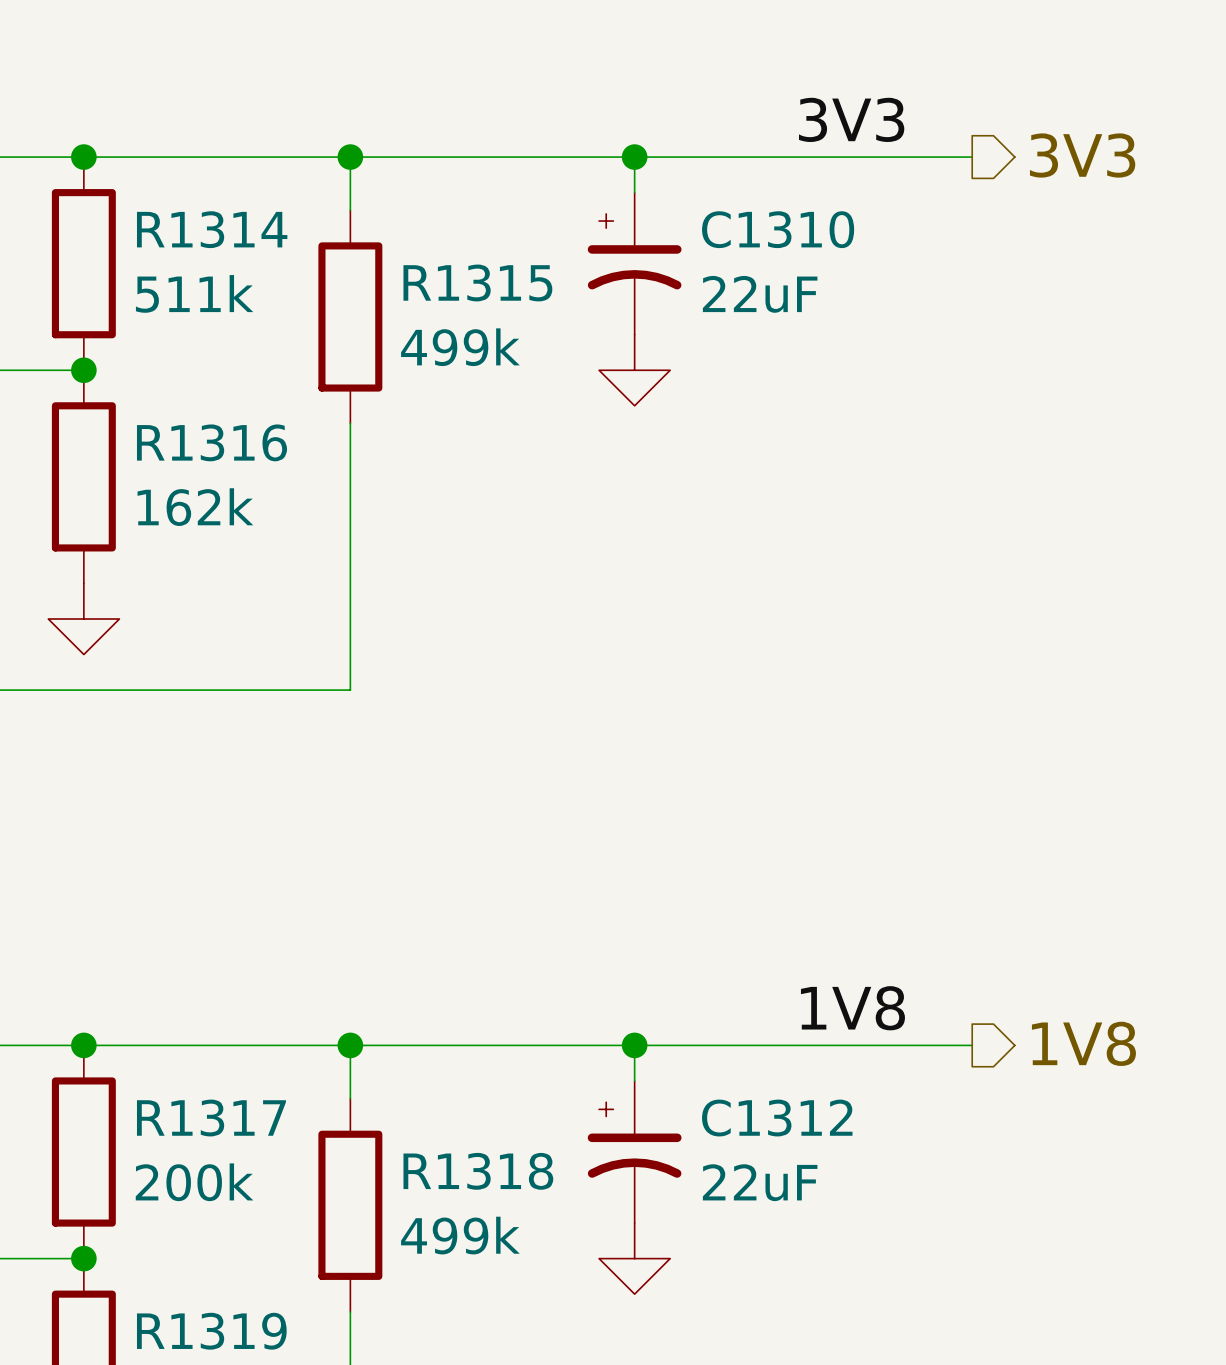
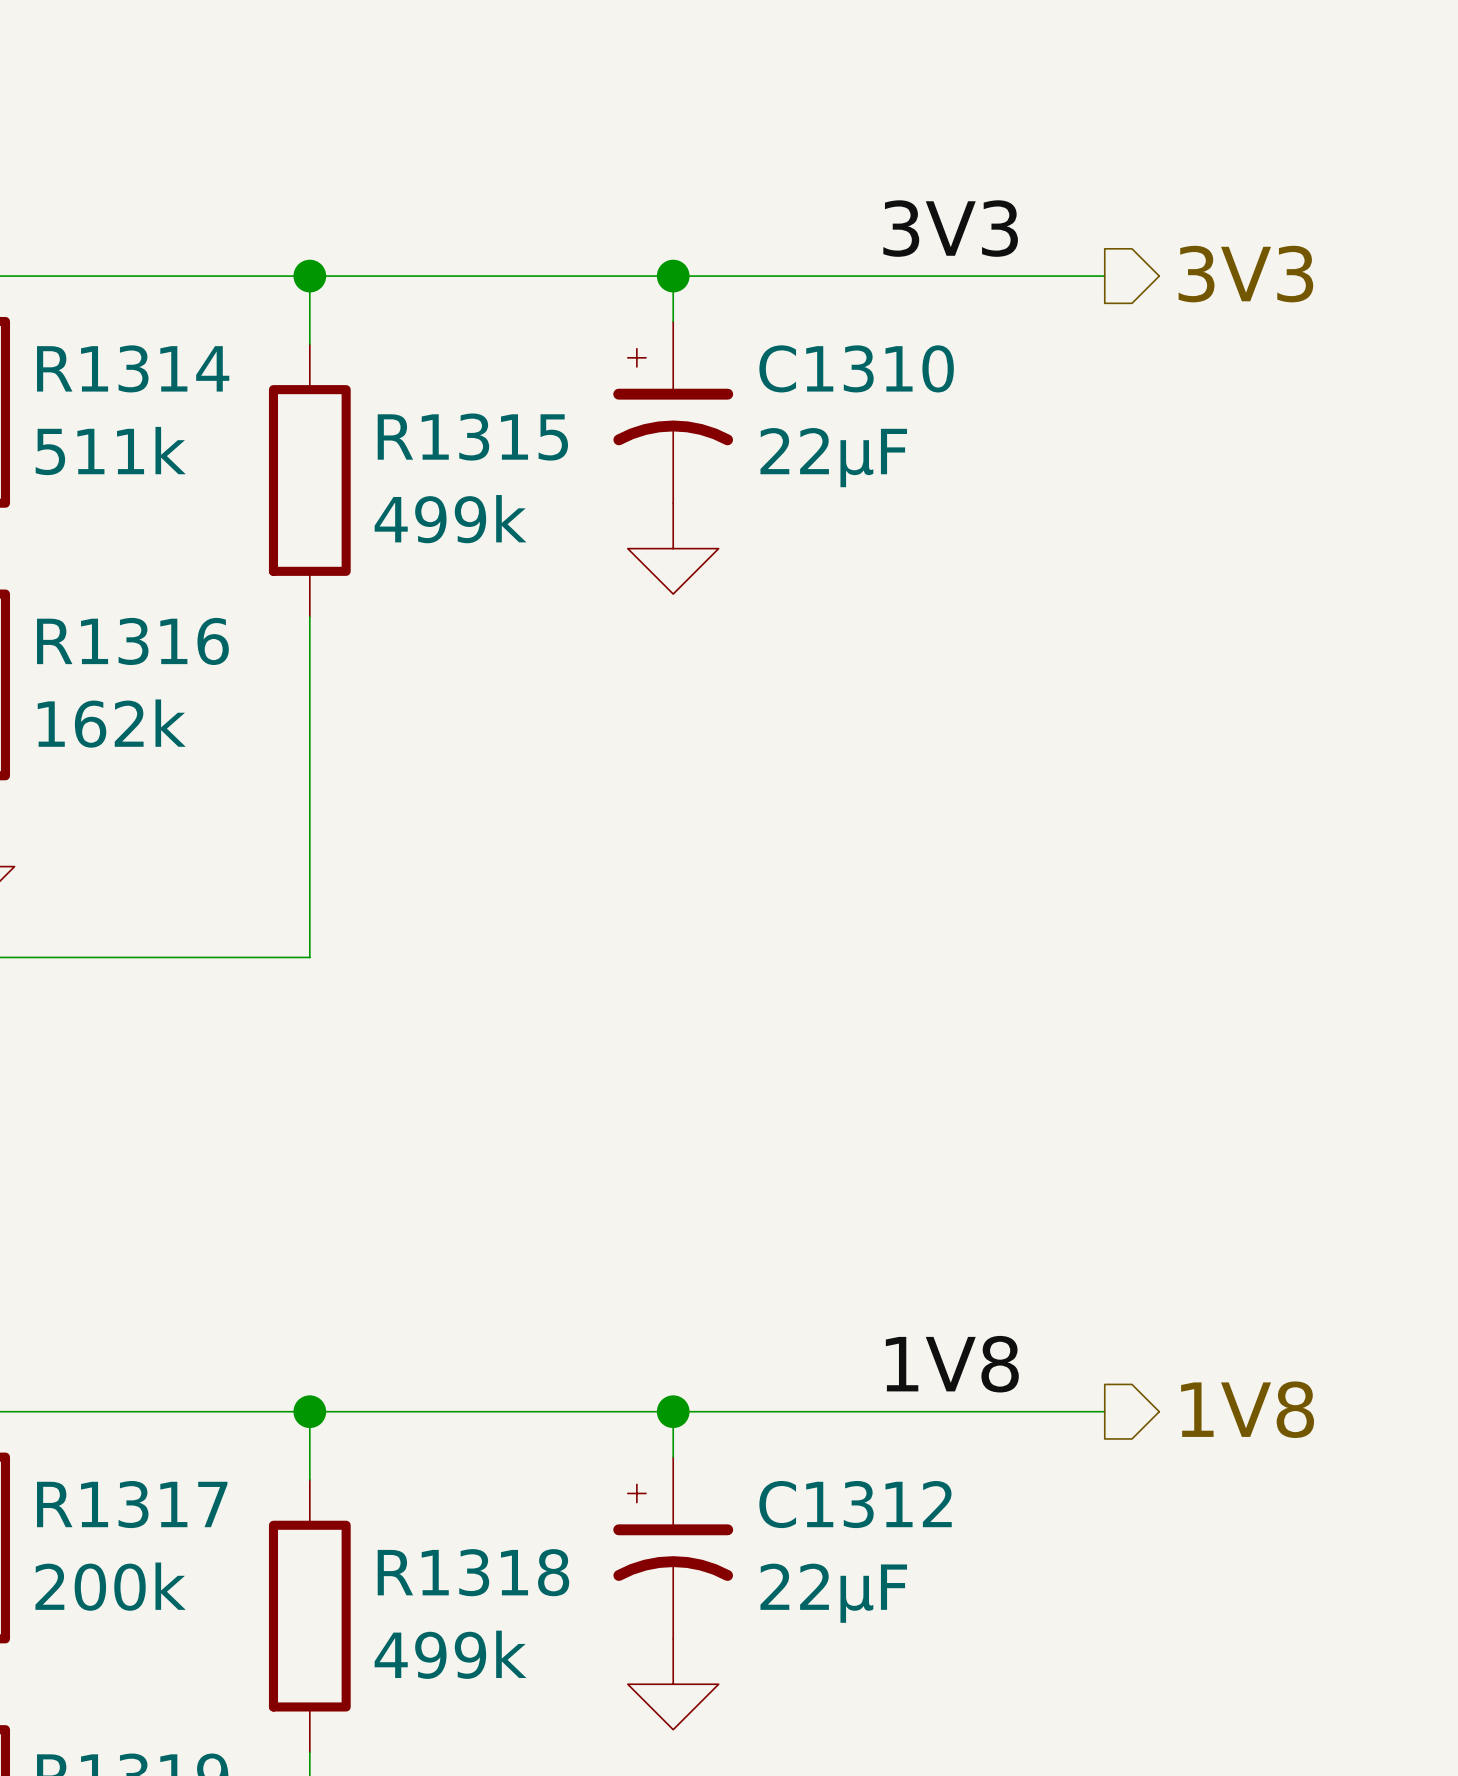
C1310 value: 22uF (760, 294) -> 22µF (833, 457)
C1312 value: 22uF (760, 1182) -> 22µF (833, 1593)

